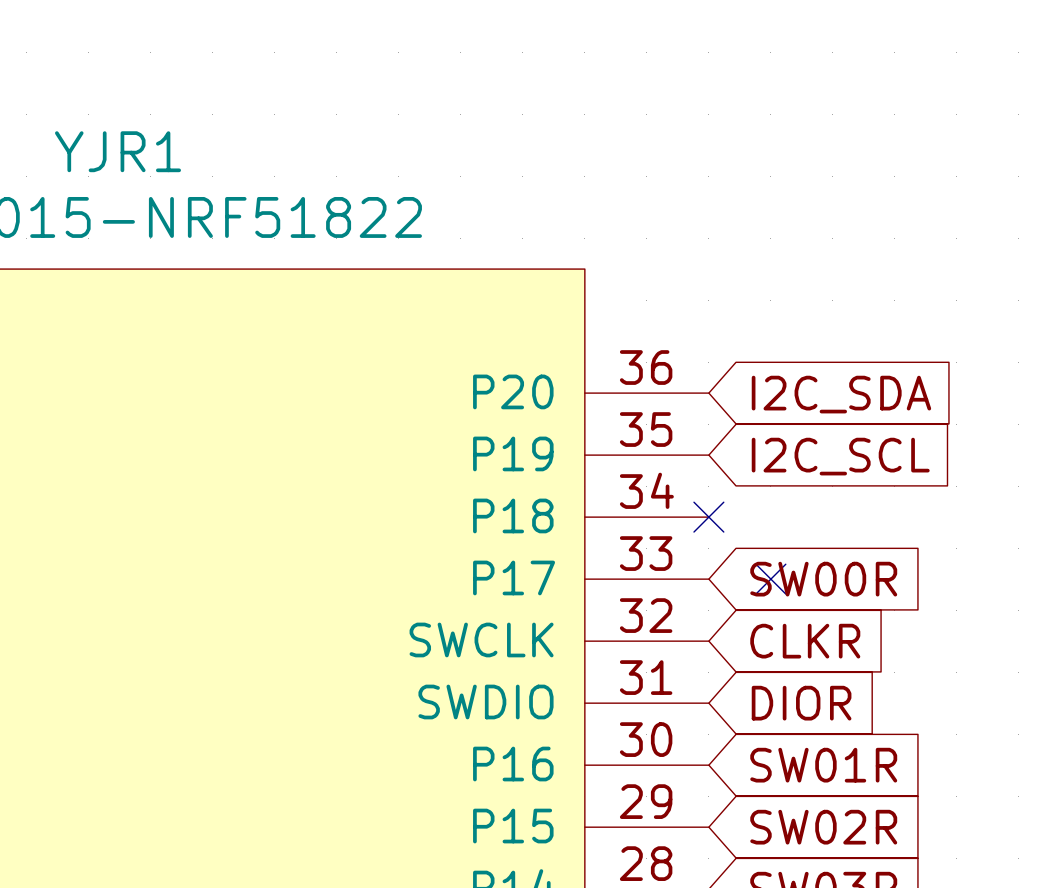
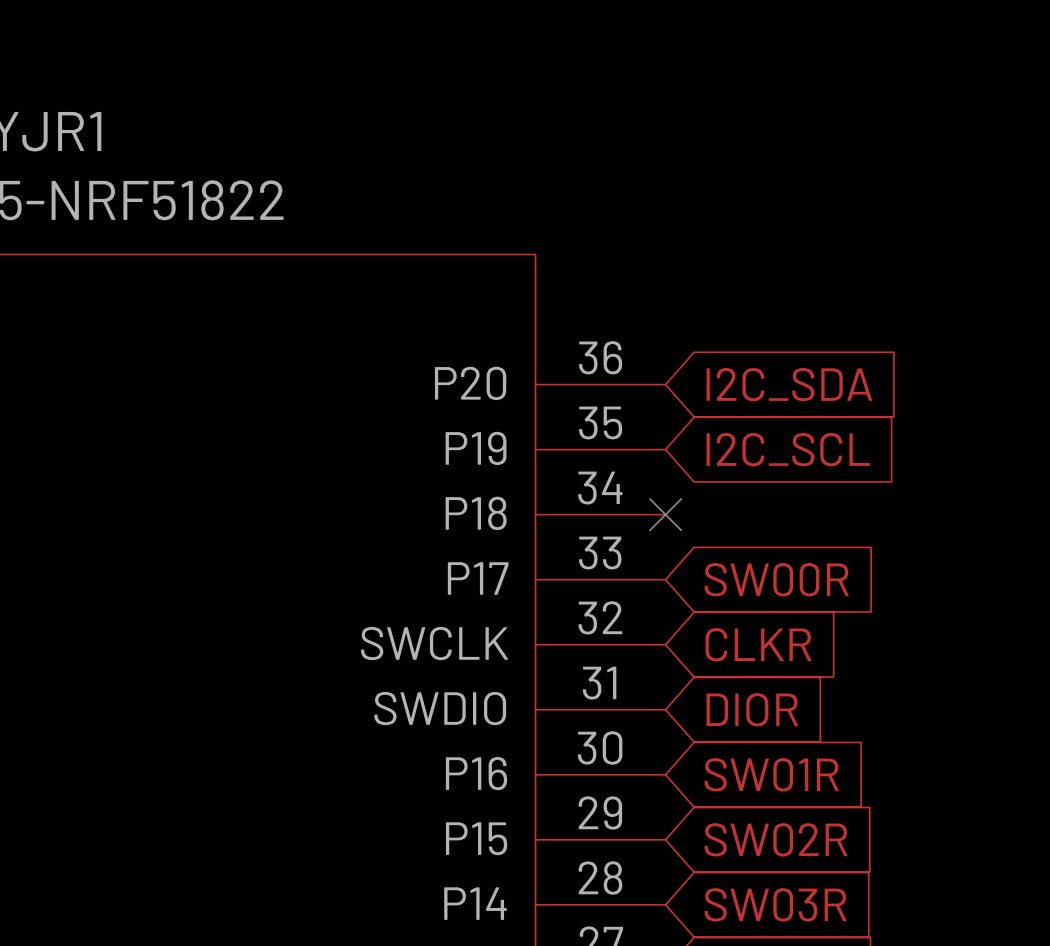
no-connect mark: (770, 579) -> none

